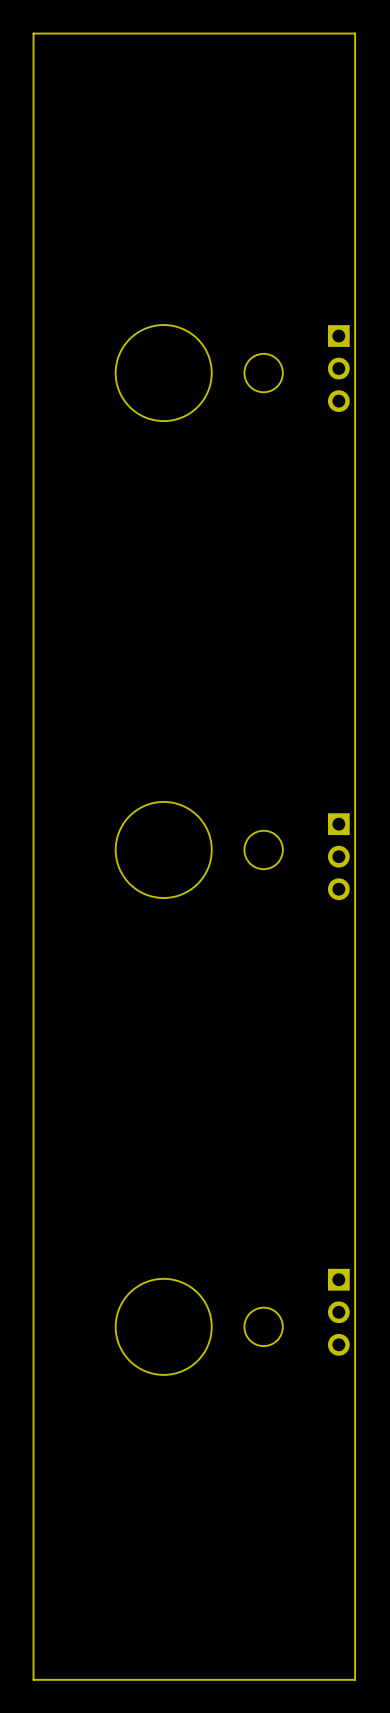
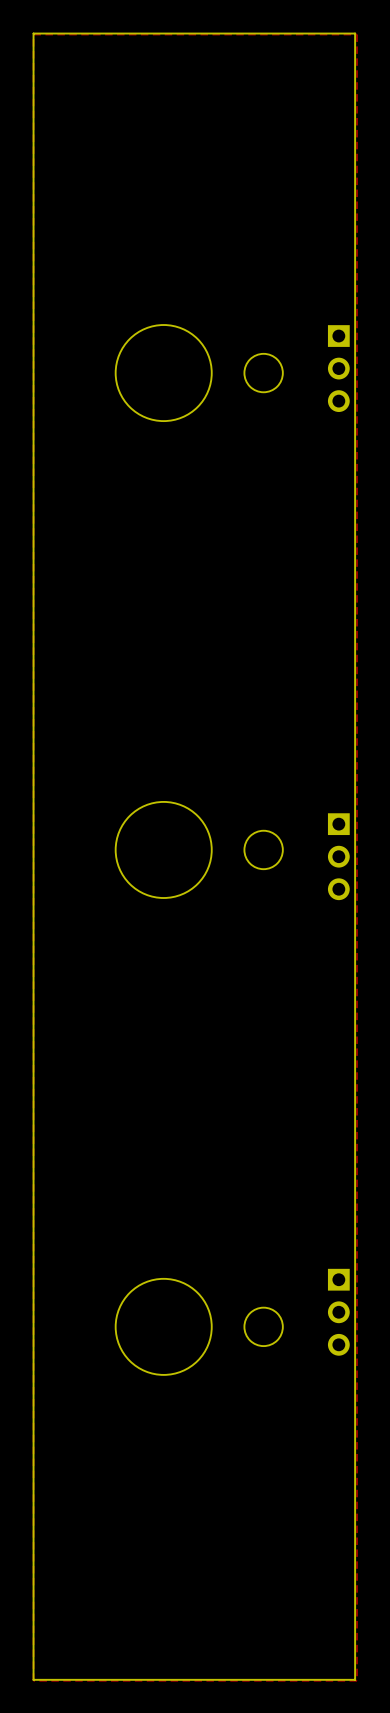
zone outline: none -> (33, 34) (357, 34) (357, 1680) (33, 1680) (33, 34)

